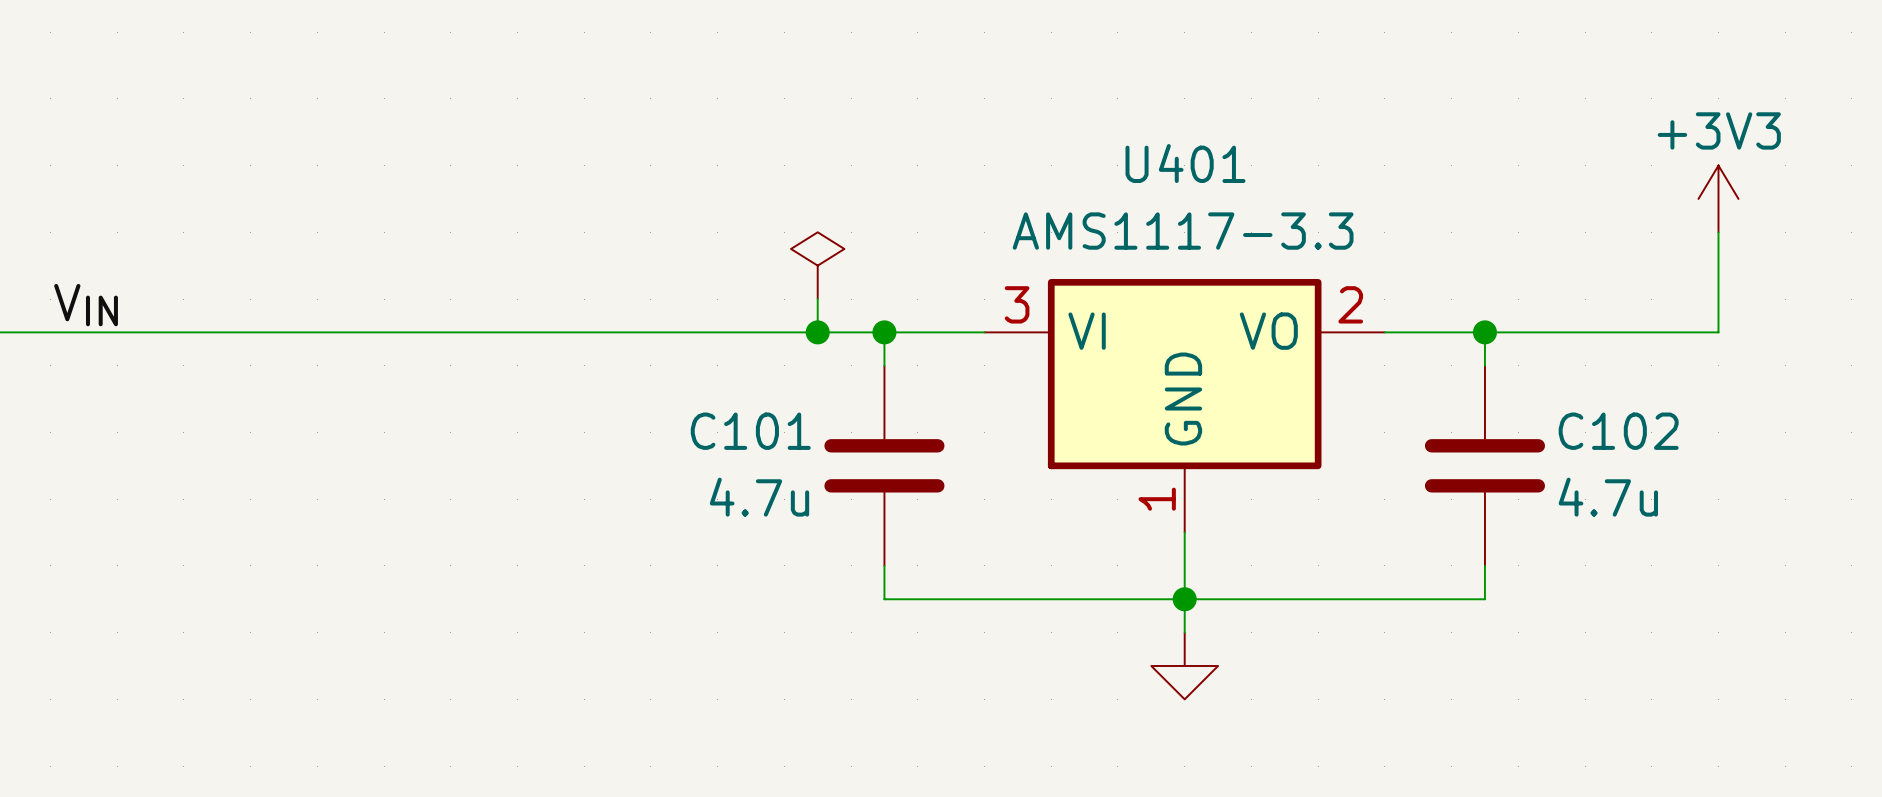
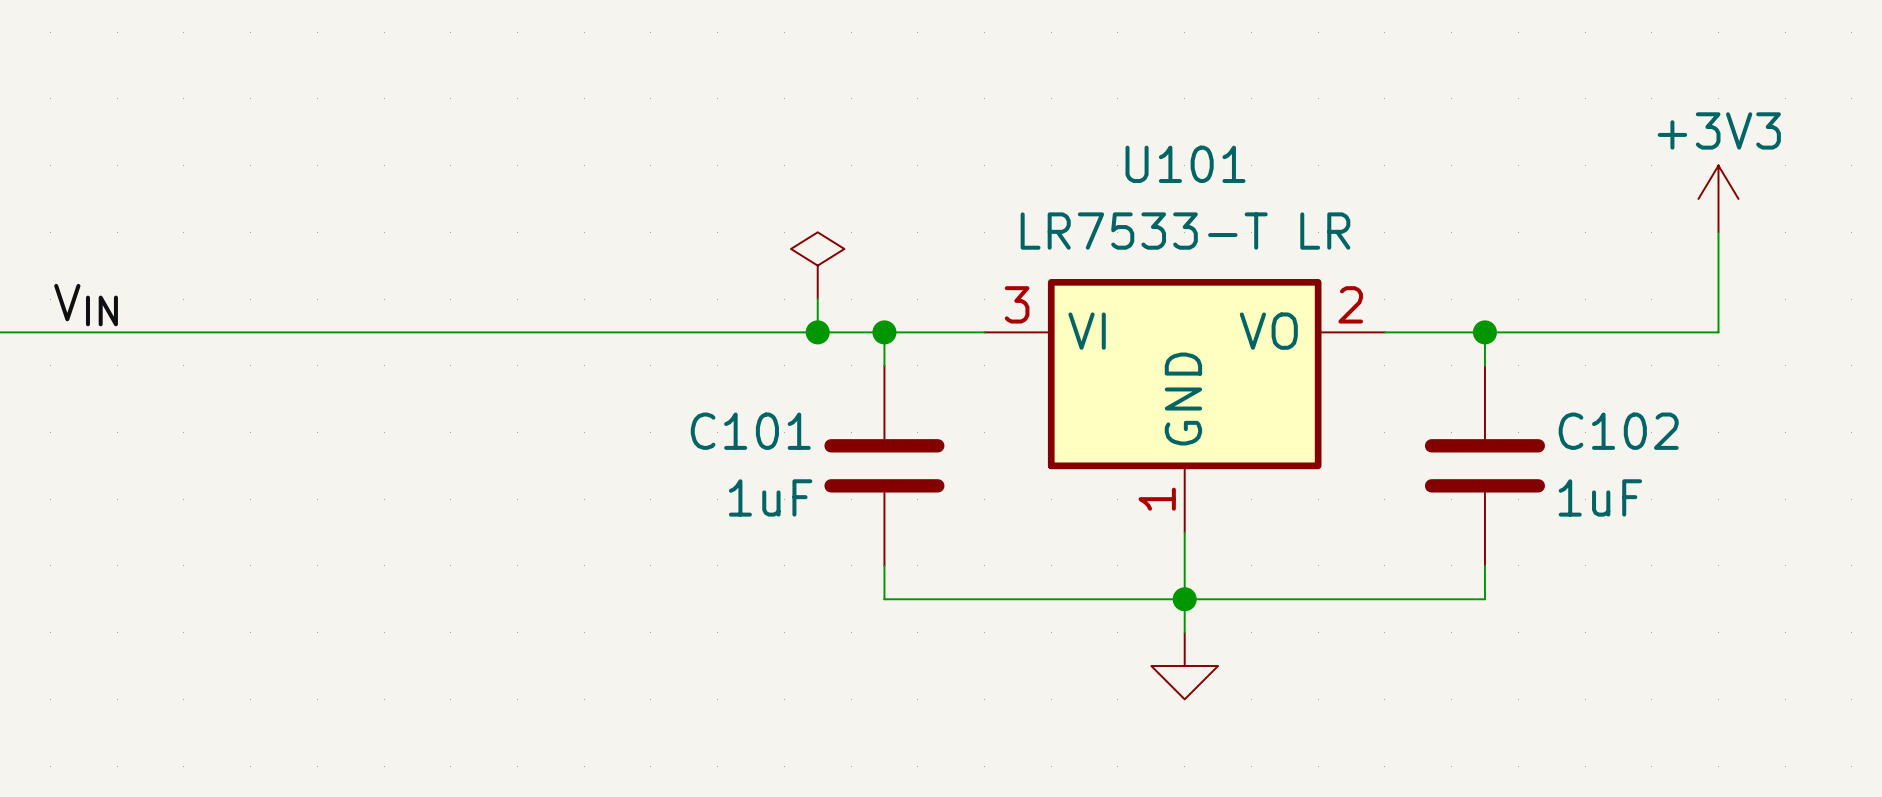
U401 name: U401 (1185, 163) -> U101 (1185, 164)
U401 value: AMS1117-3.3 (1183, 231) -> LR7533-T LR (1185, 231)
C101 value: 4.7u (759, 497) -> 1uF (770, 497)
C102 value: 4.7u (1608, 497) -> 1uF (1600, 497)

